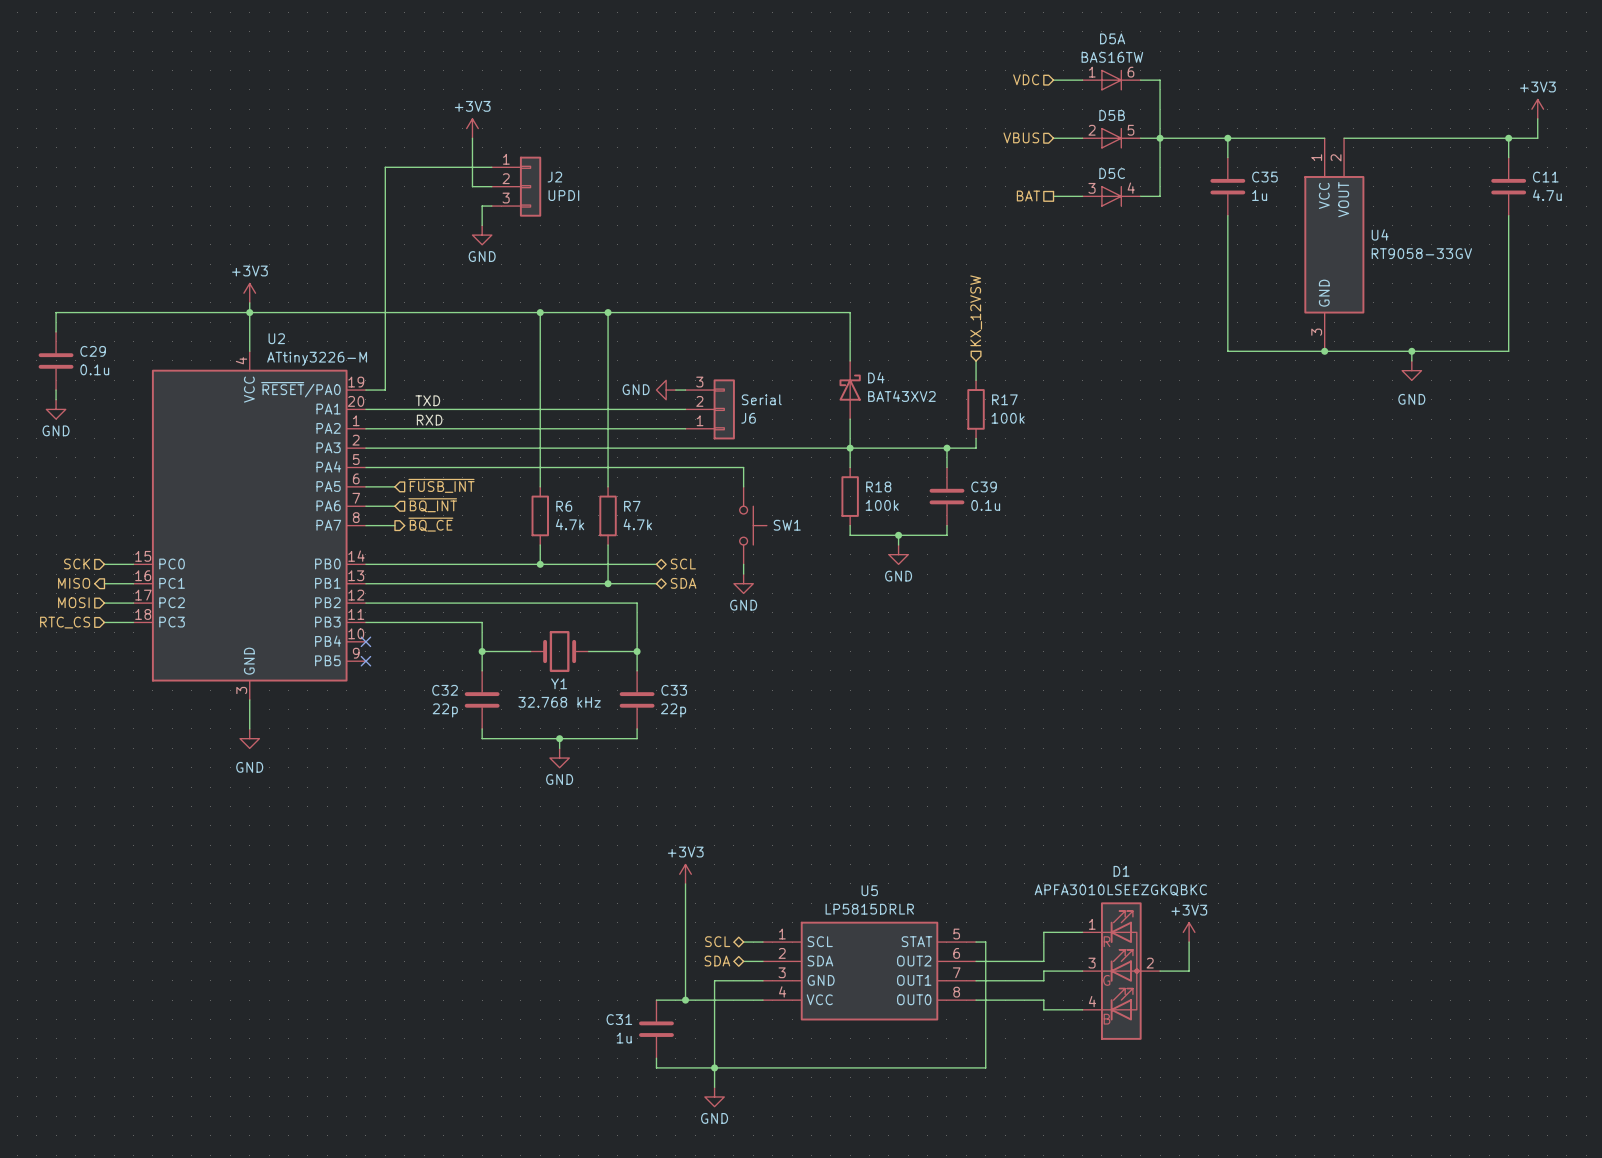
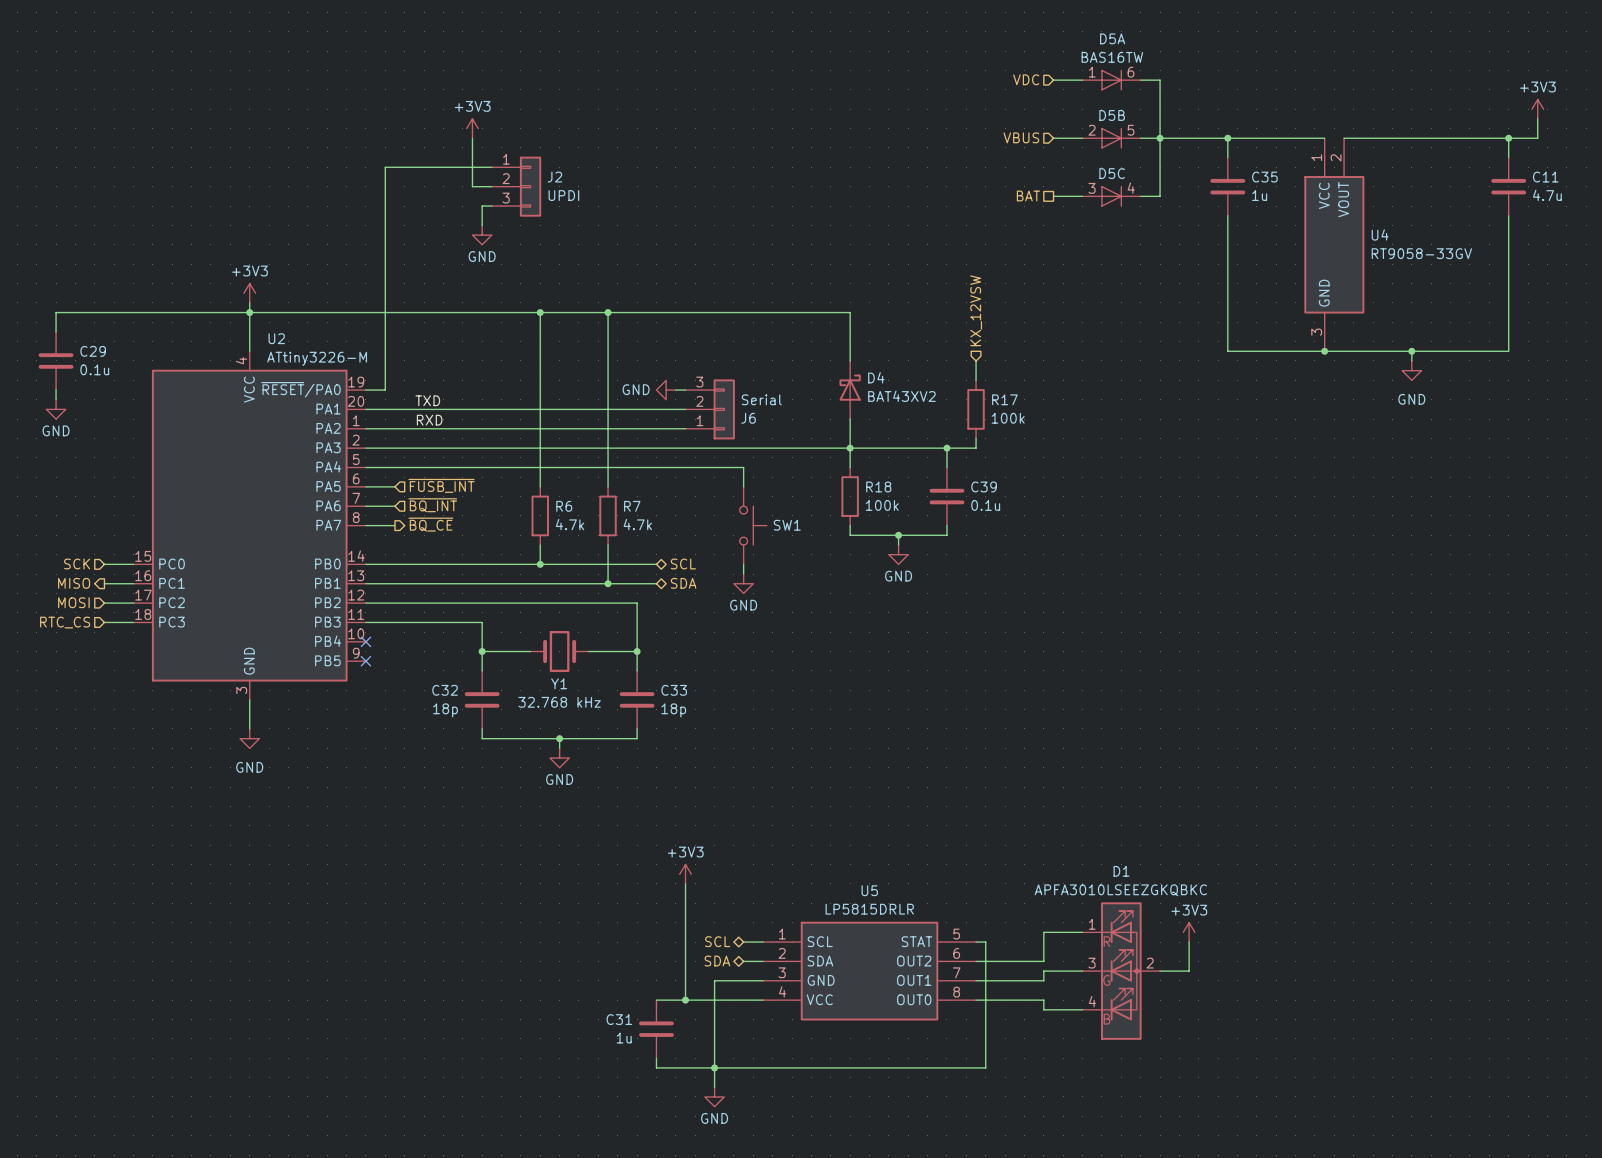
C32 value: 22p (445, 710) -> 18p (445, 710)
C33 value: 22p (673, 710) -> 18p (673, 710)

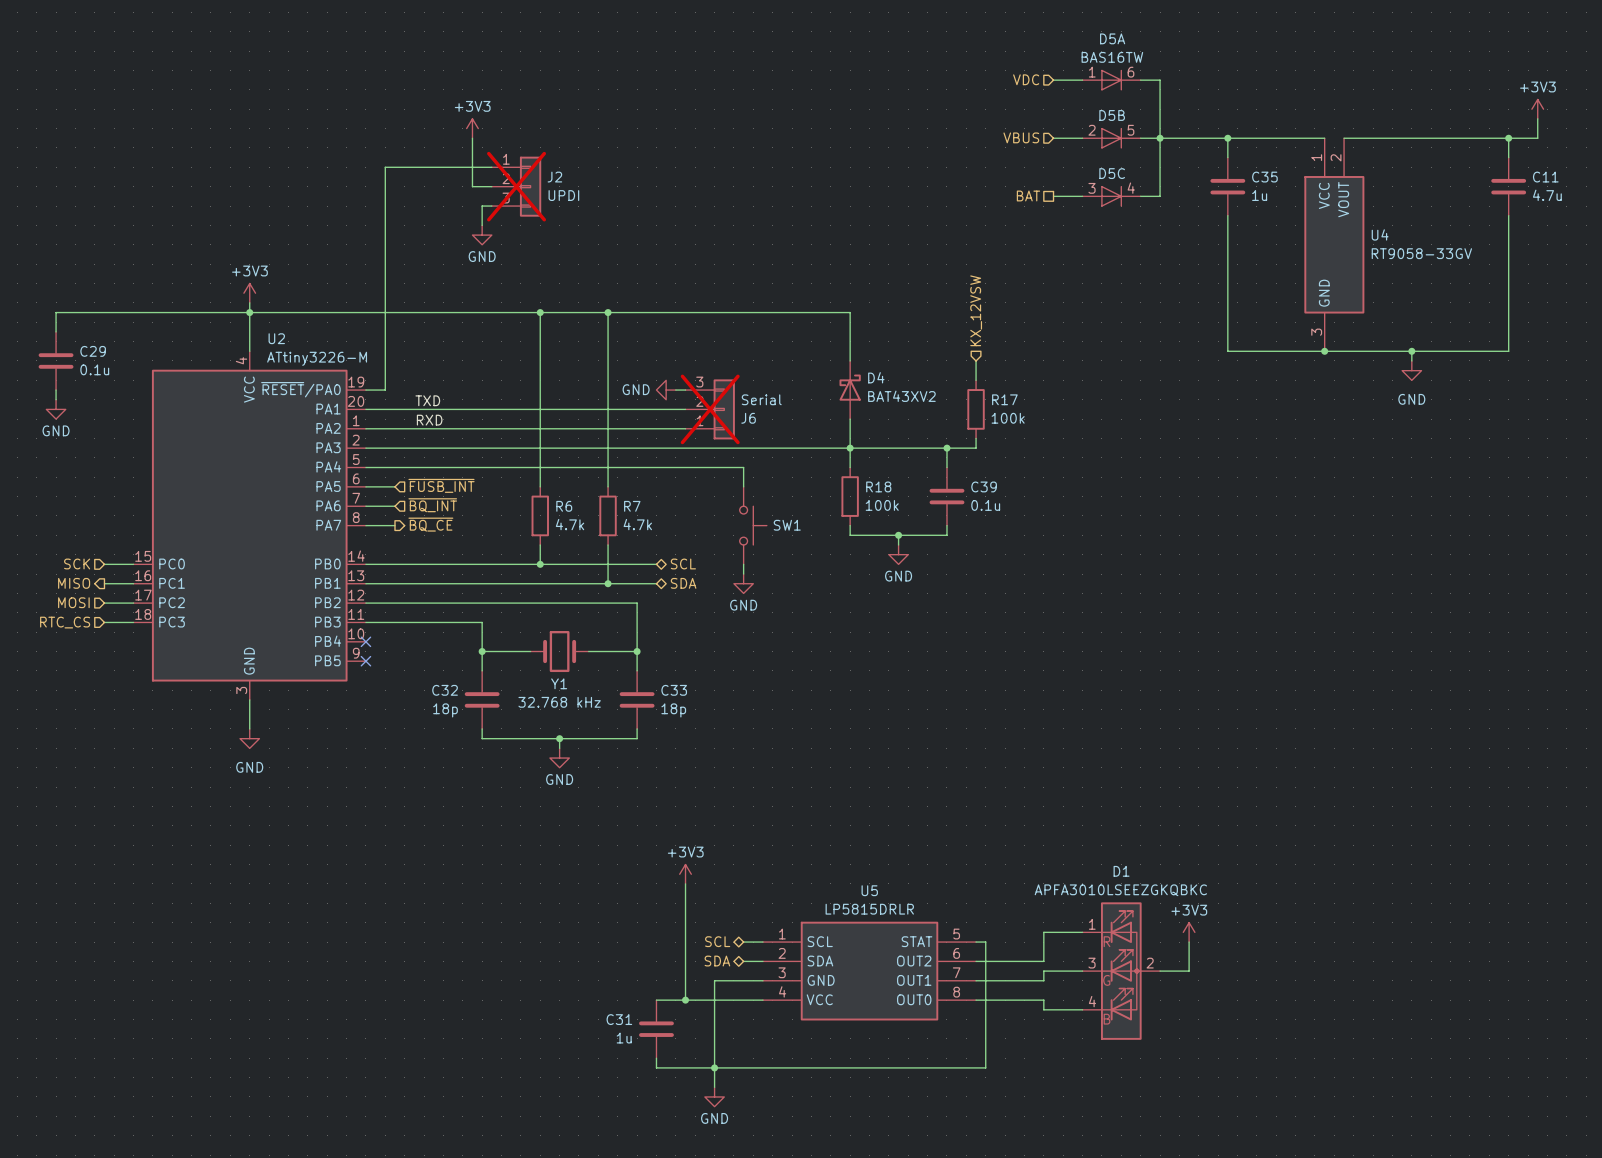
J2 do-not-place cross: none -> (516, 186)
J6 do-not-place cross: none -> (710, 409)

